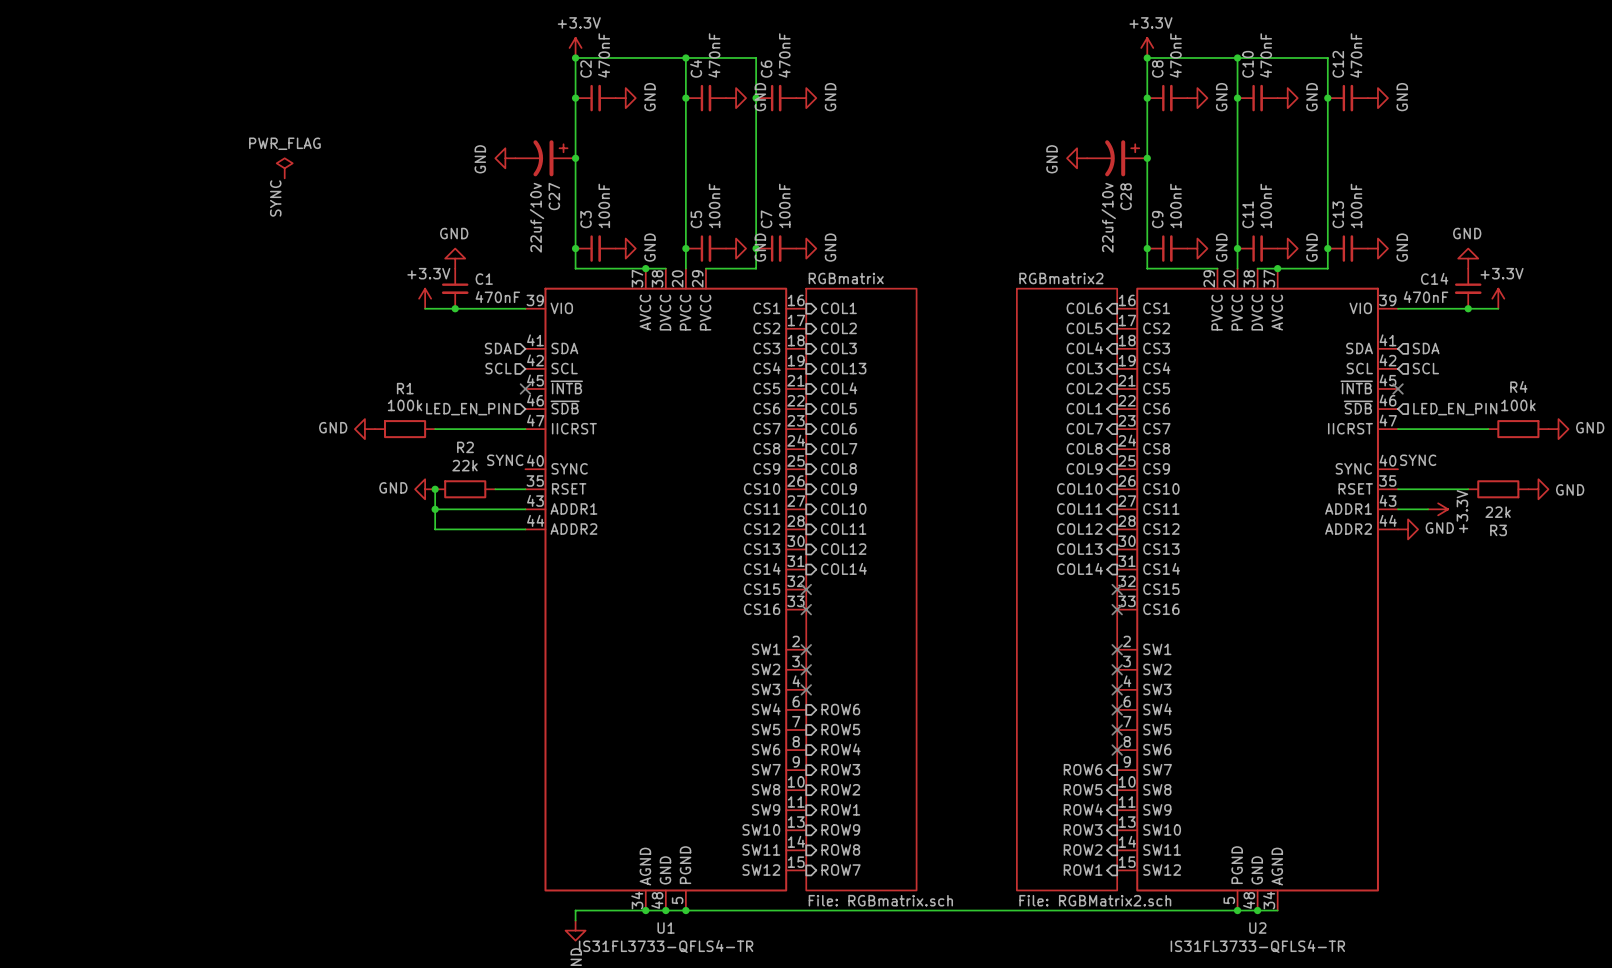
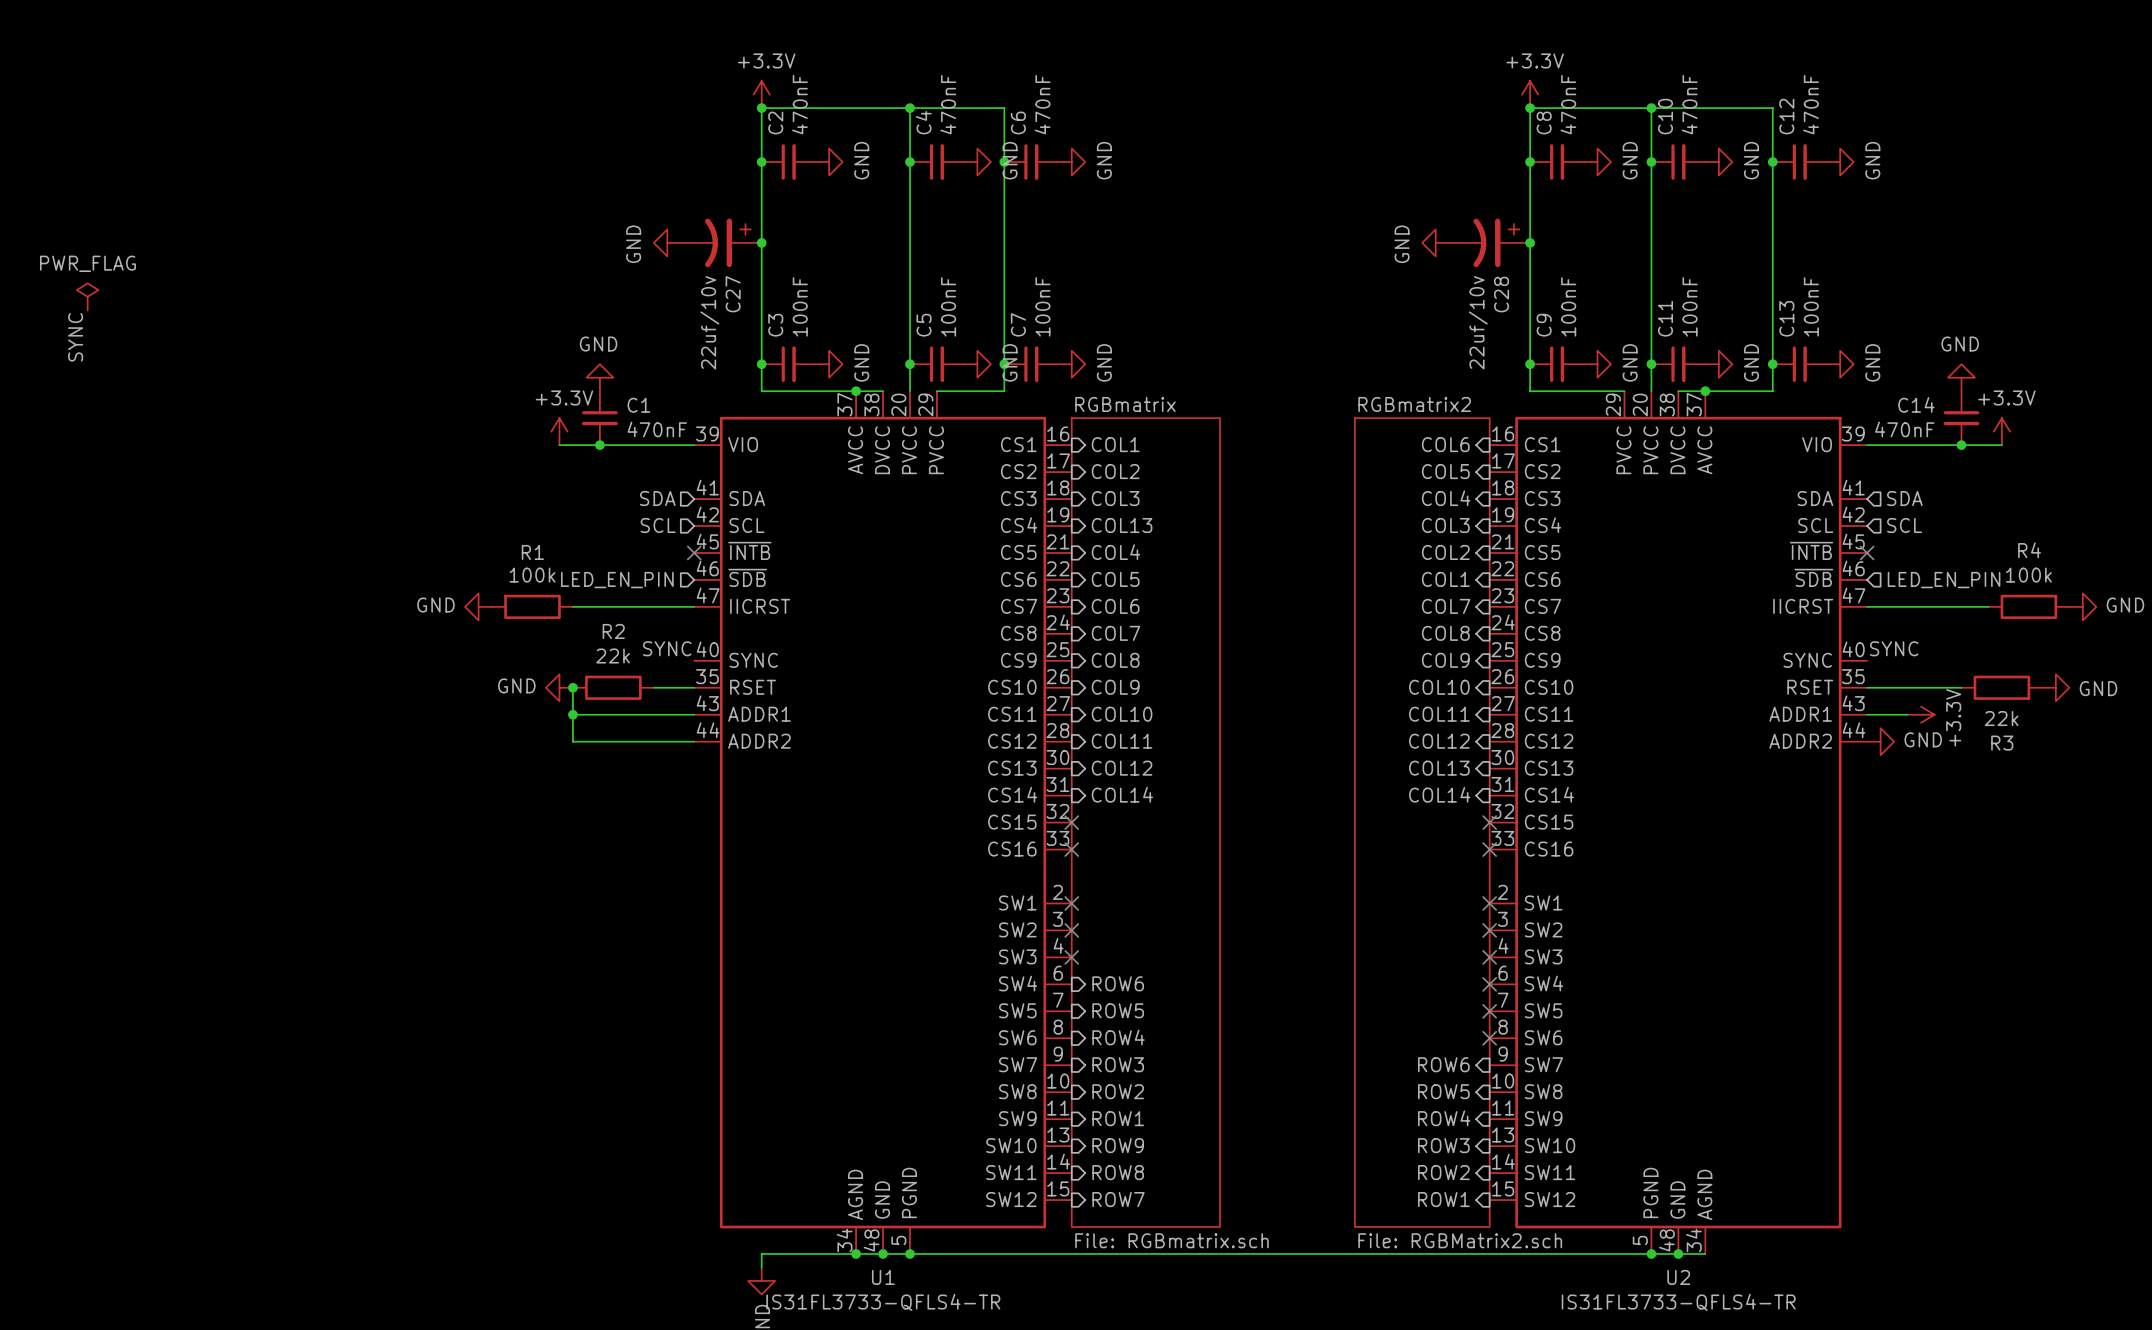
power symbol: PWR_FLAG (284, 168) -> none
power symbol: none -> PWR_FLAG (87, 296)
label: SYNC (275, 198) -> none
label: none -> SYNC (75, 337)

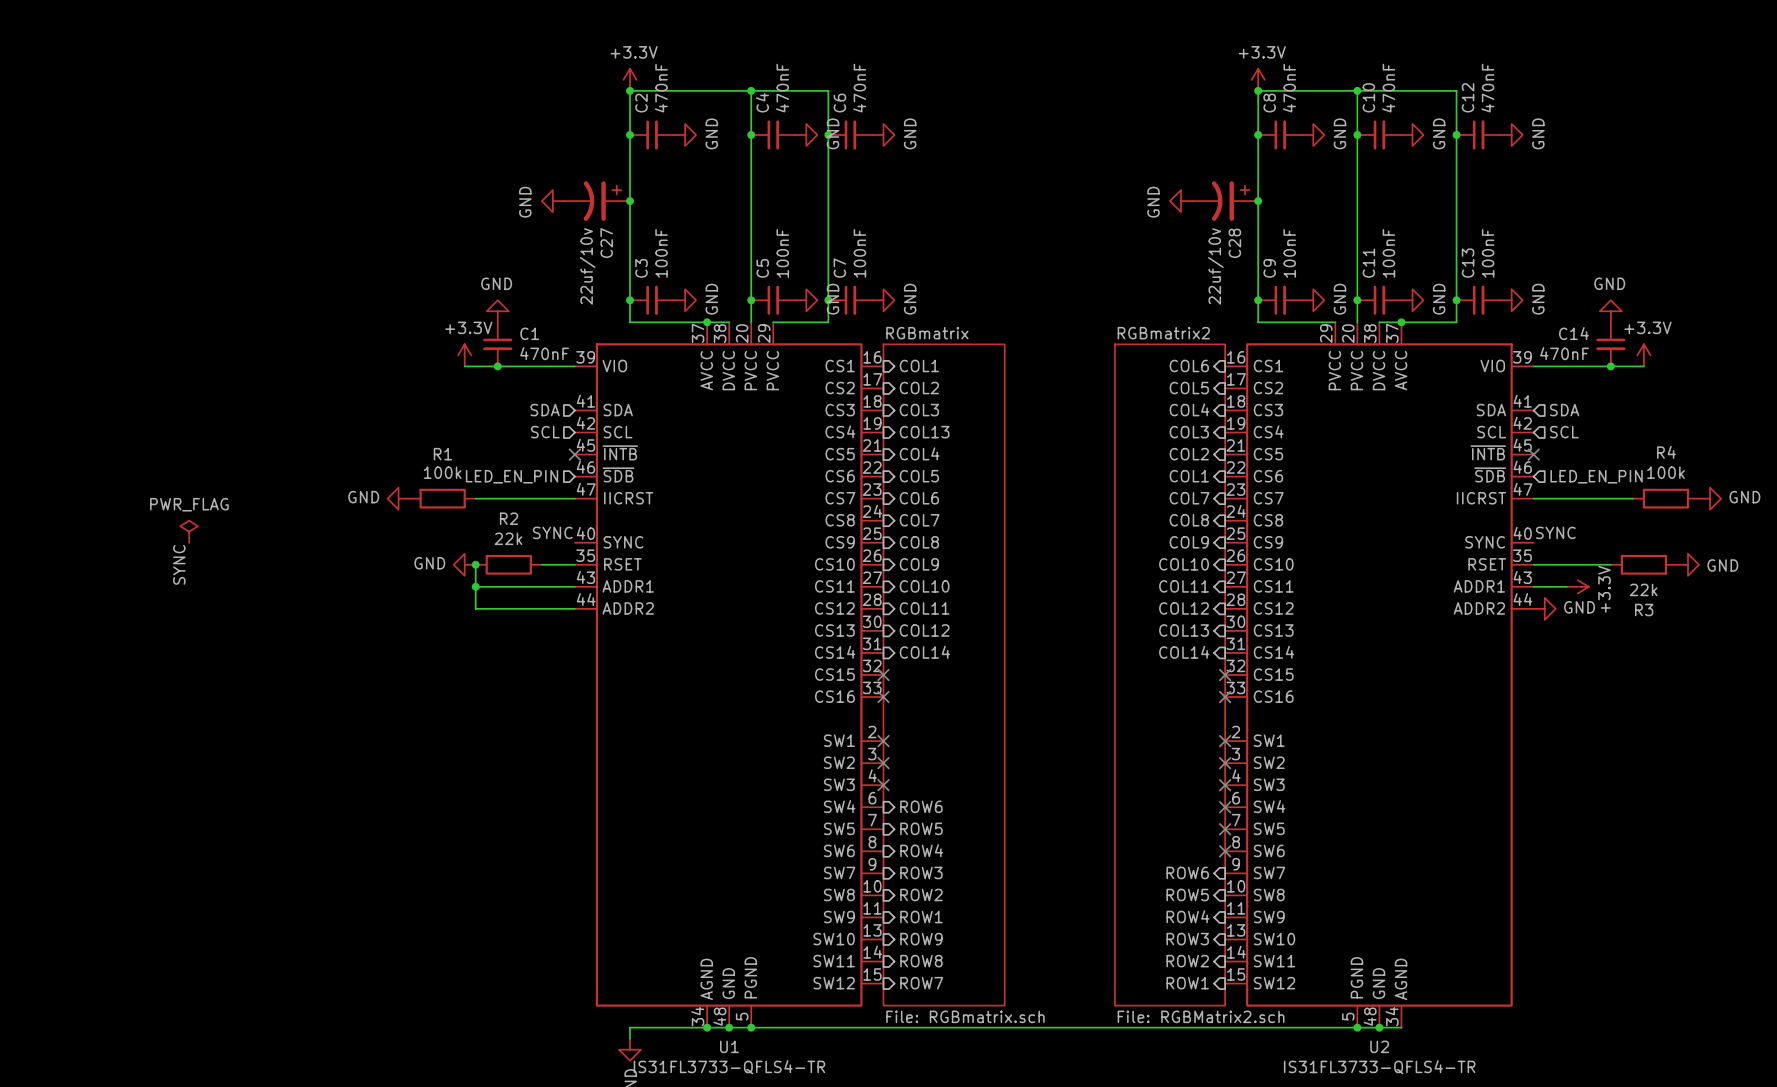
power symbol: PWR_FLAG (87, 296) -> none
label: SYNC (75, 337) -> none
power symbol: none -> PWR_FLAG (189, 531)
label: none -> SYNC (179, 564)

